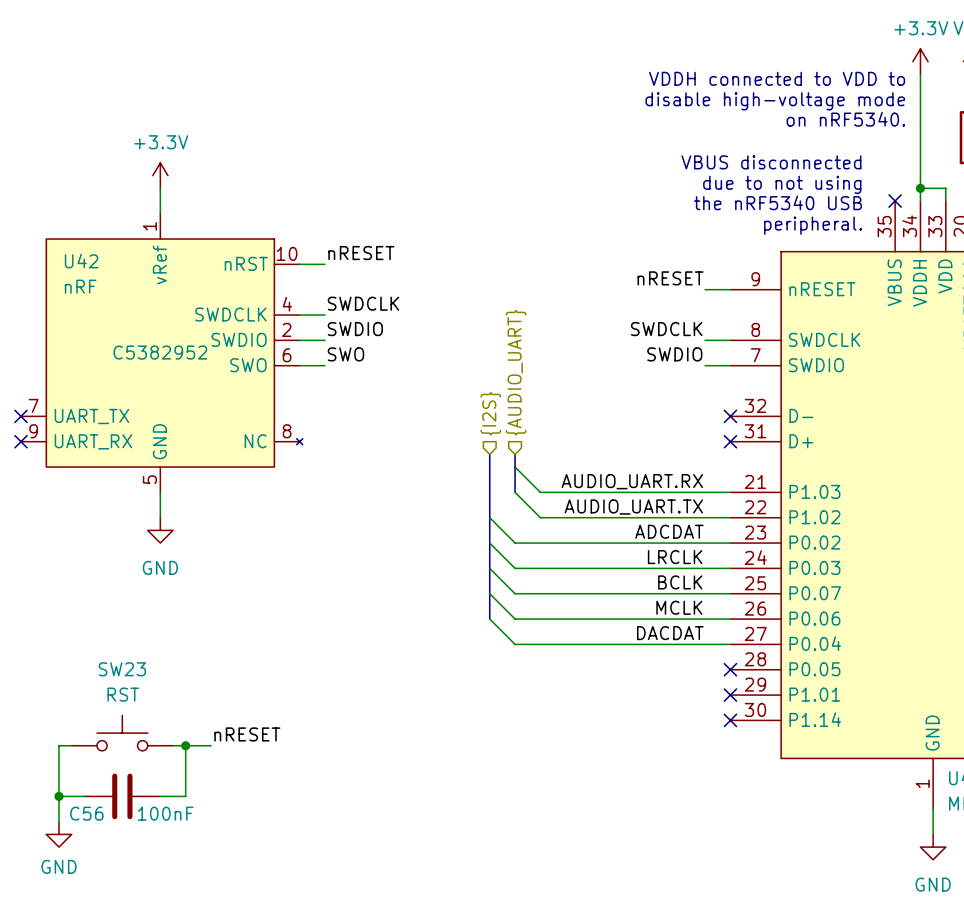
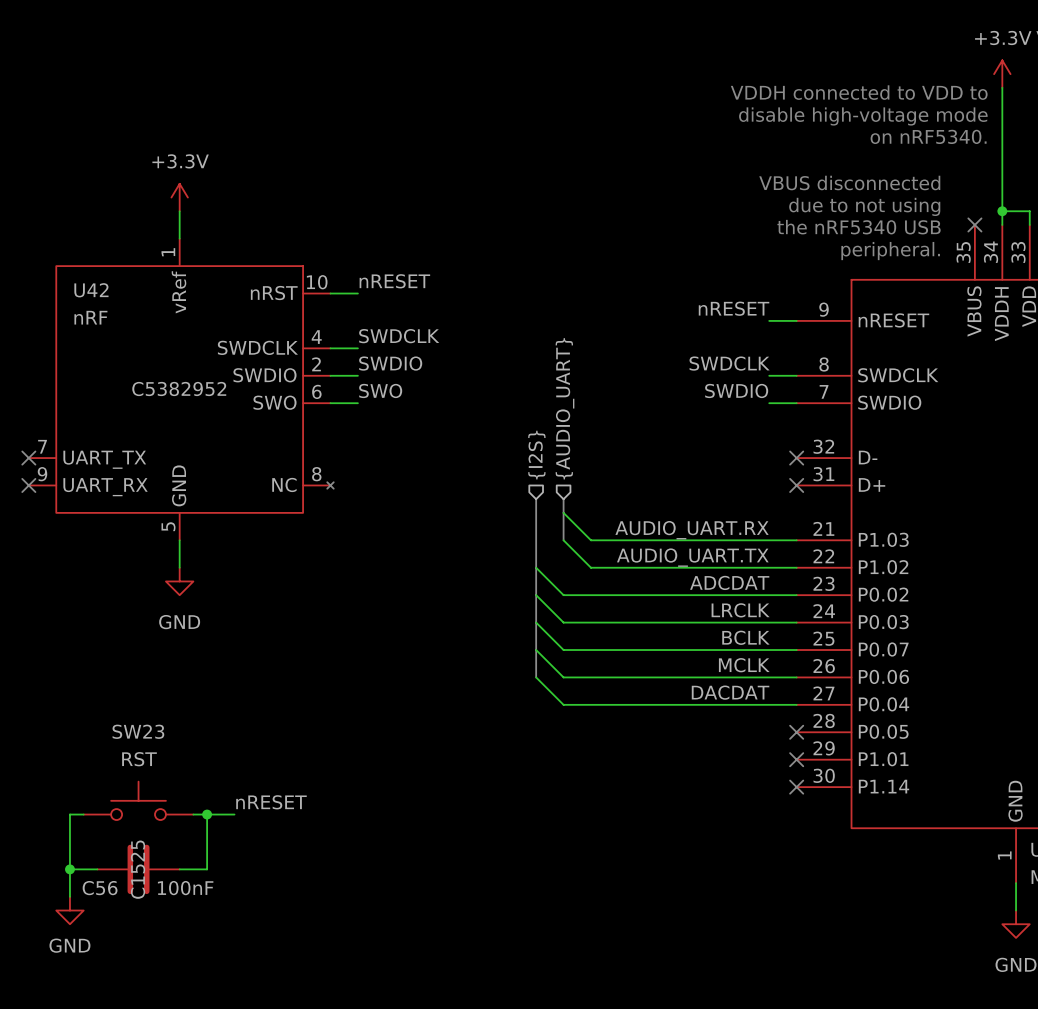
C56 text: none -> C1525 (138, 869)

